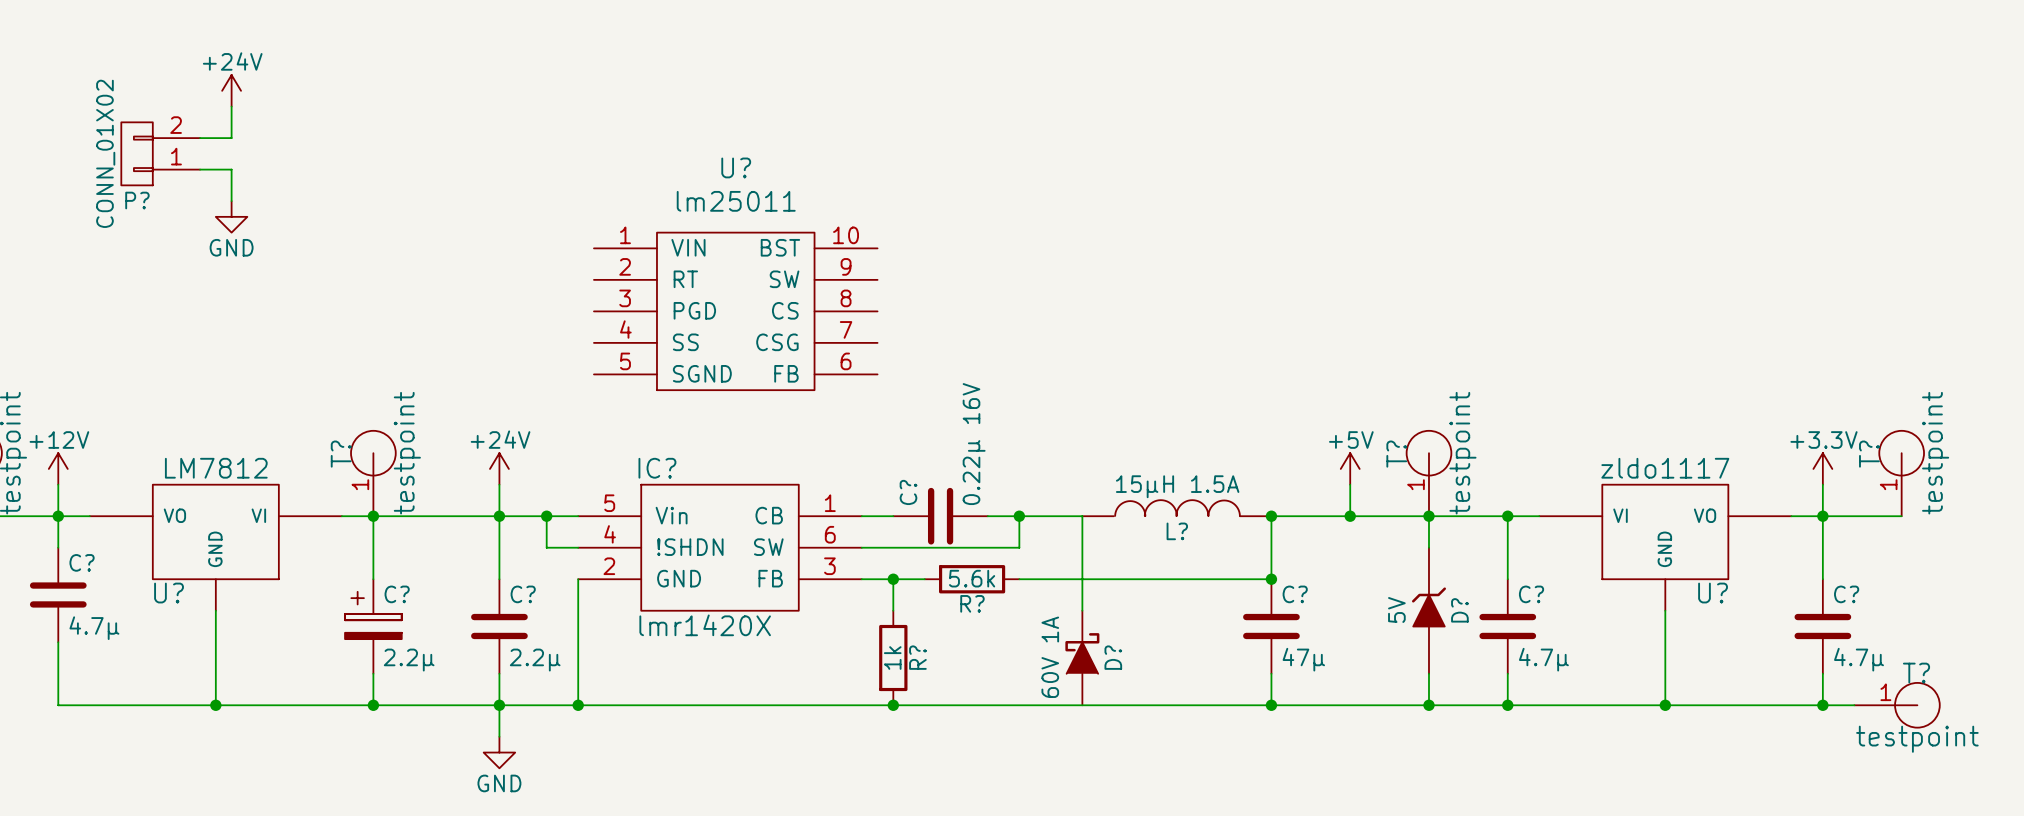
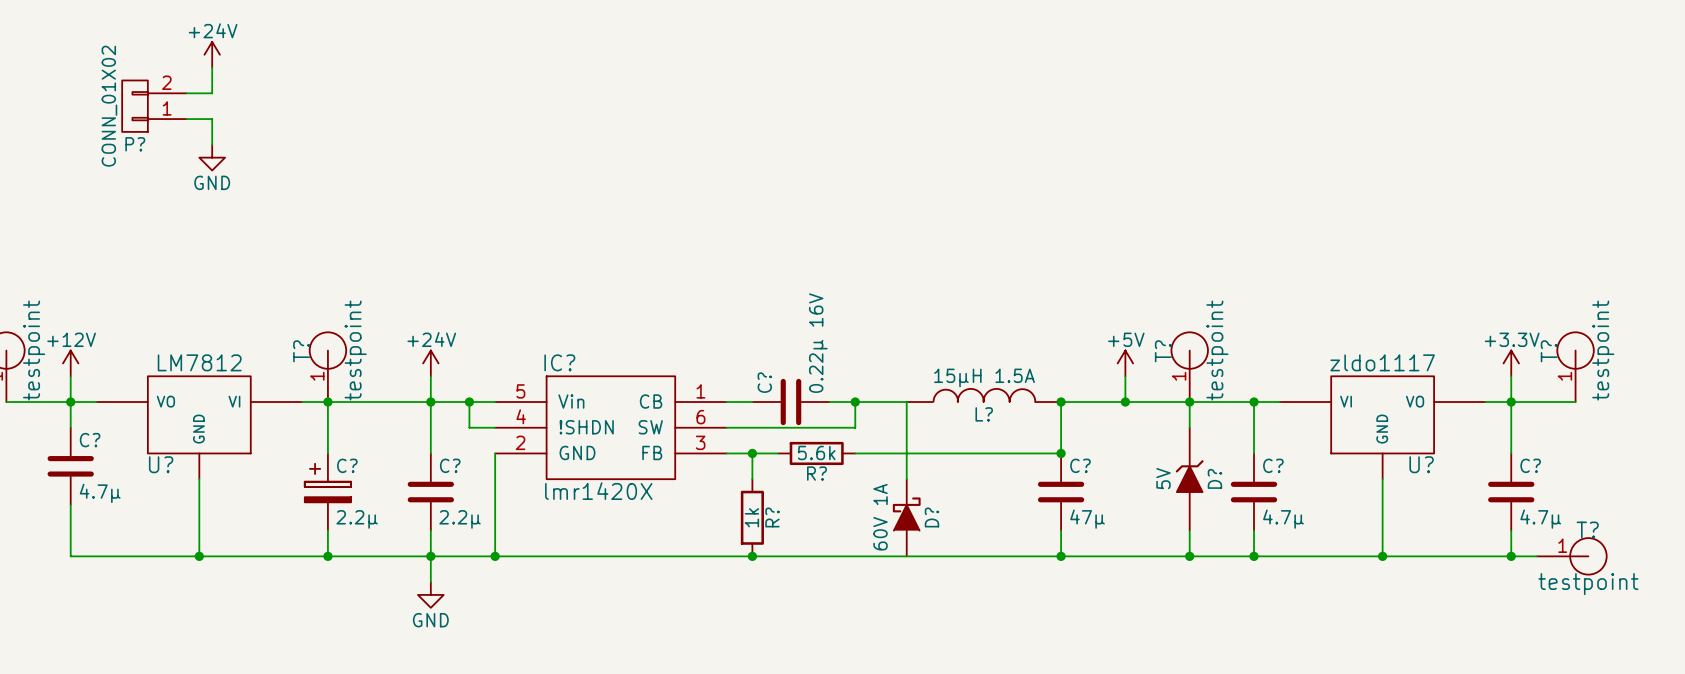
U?: lm25011 (735, 311) -> none

